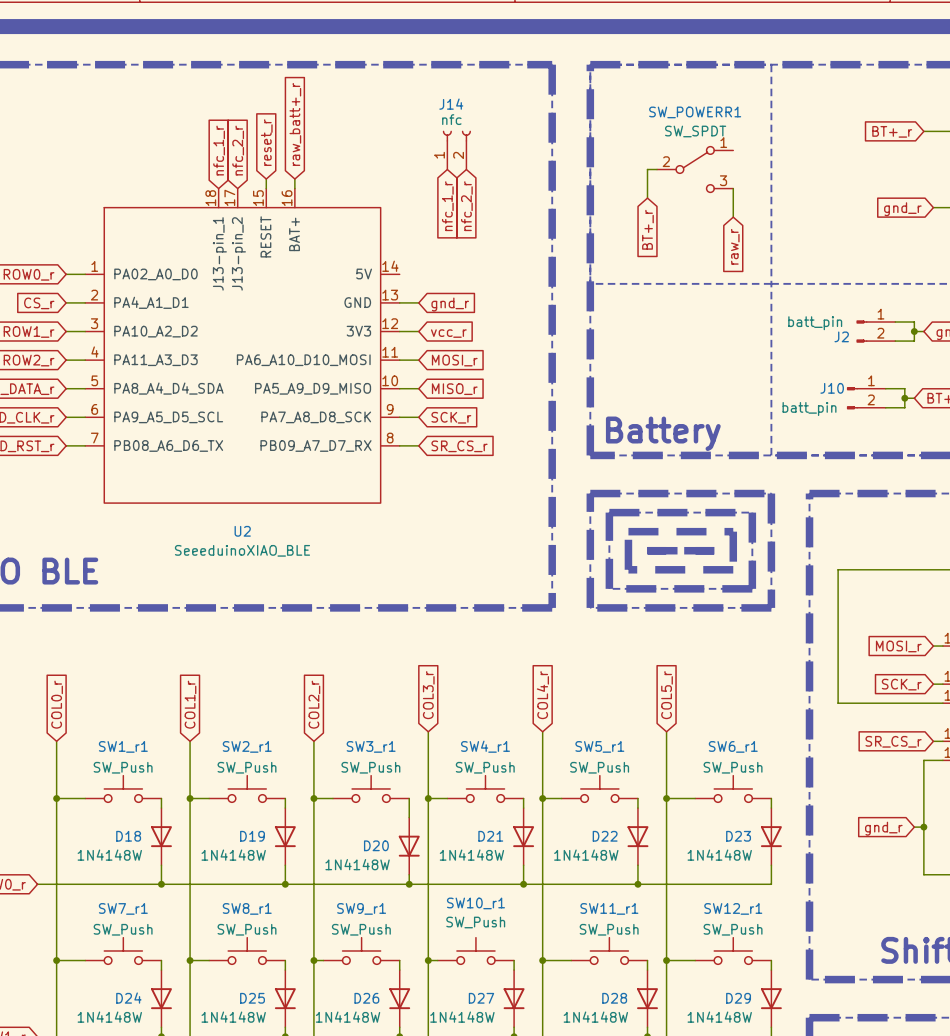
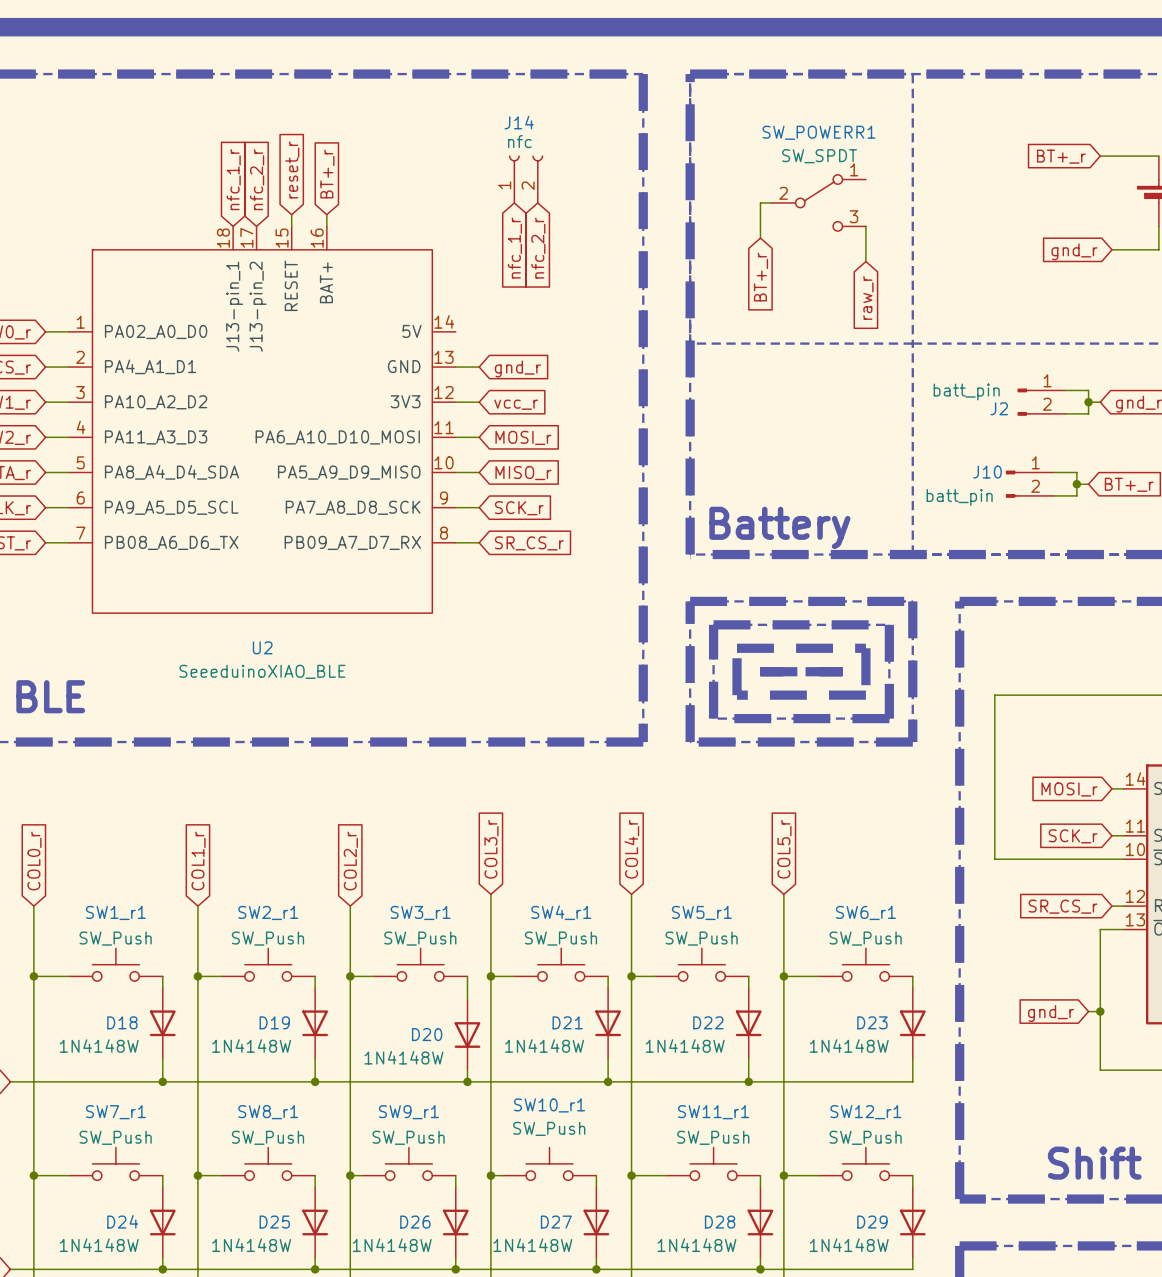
global label: raw_batt+_r (295, 124) -> BT+_r (327, 174)

